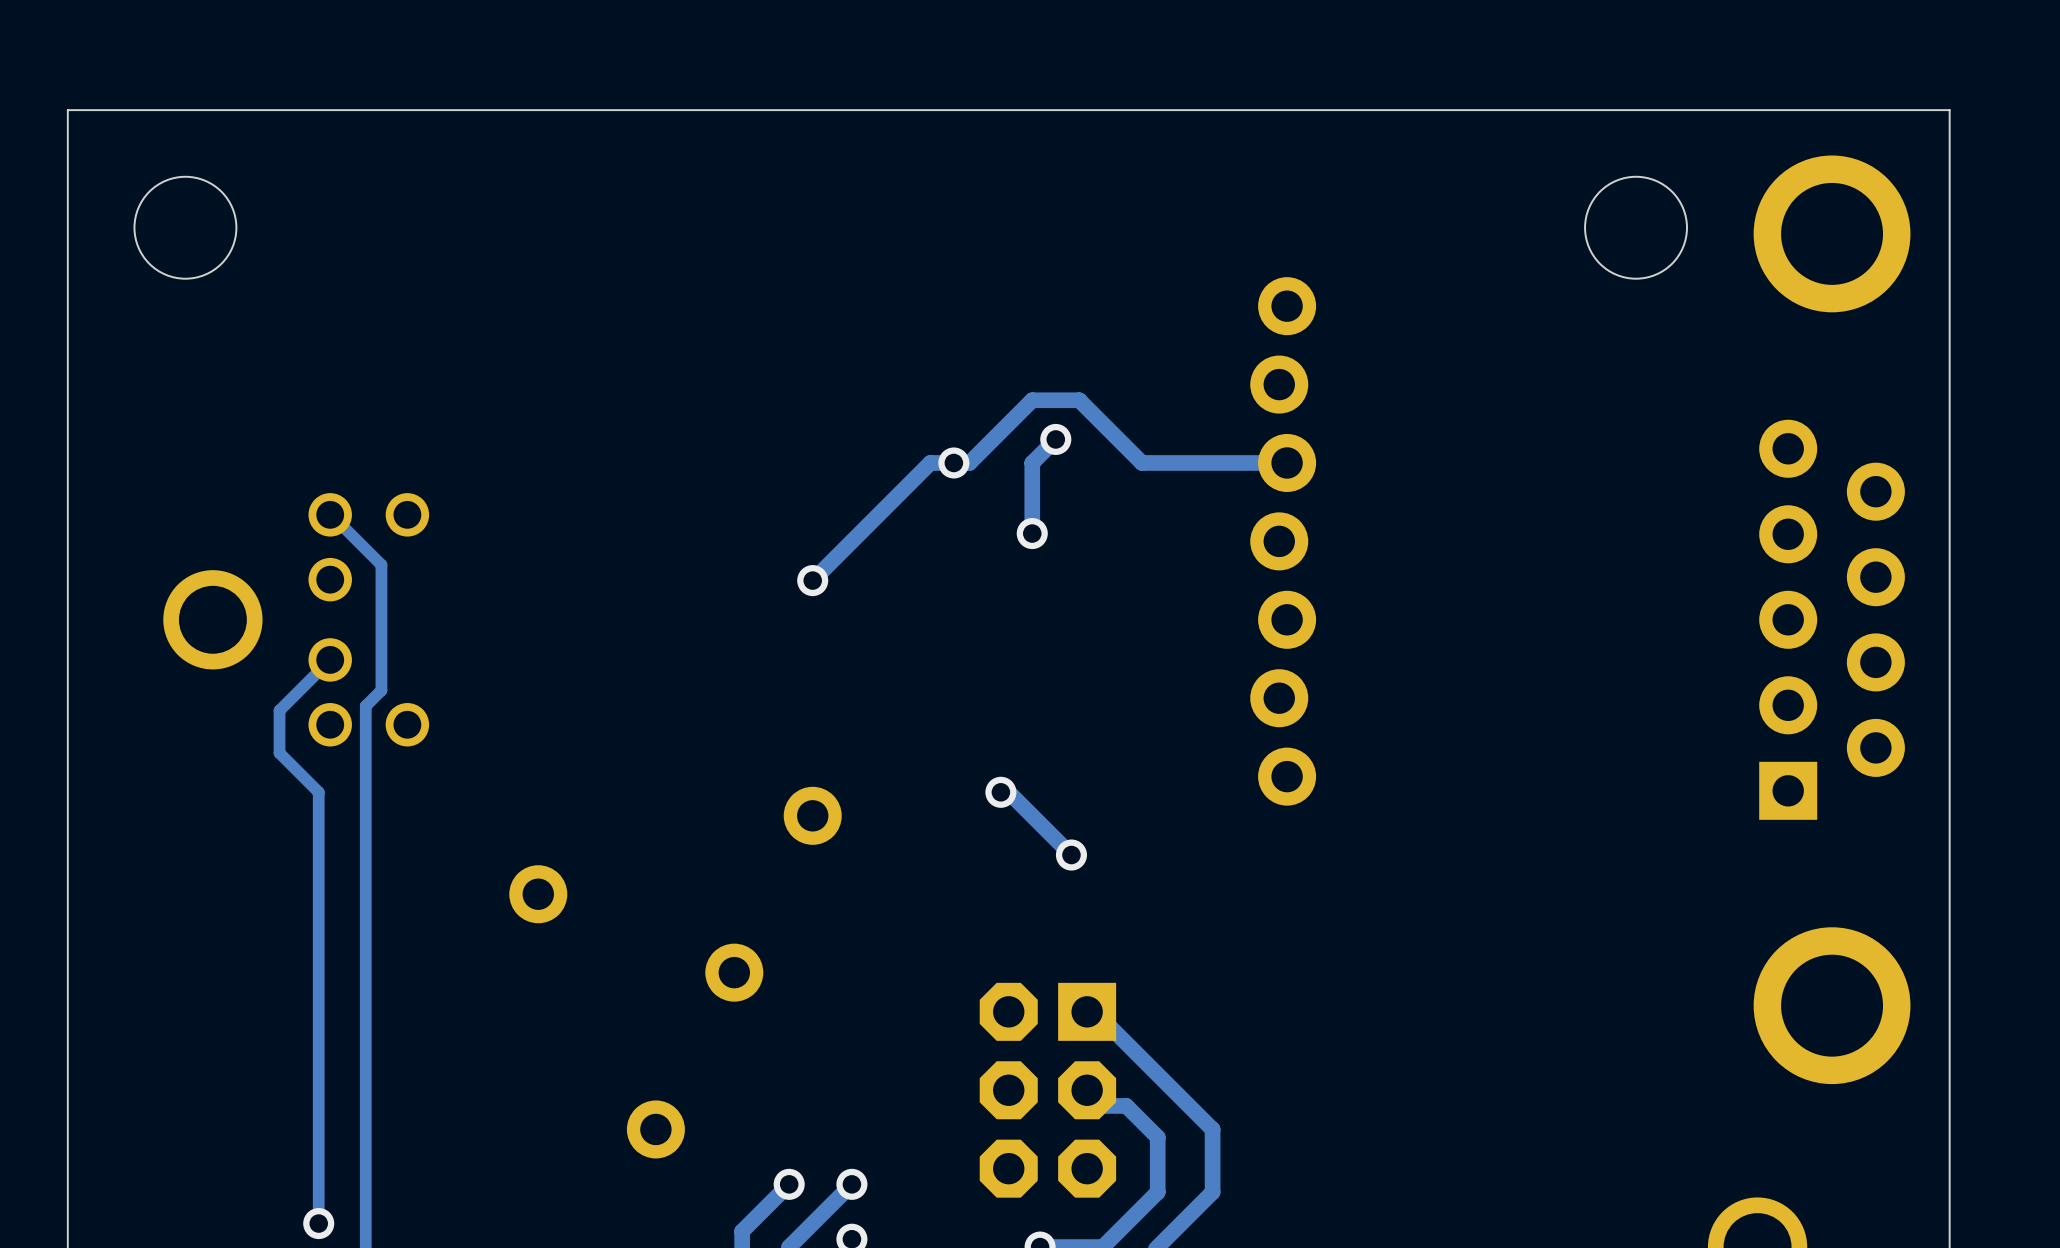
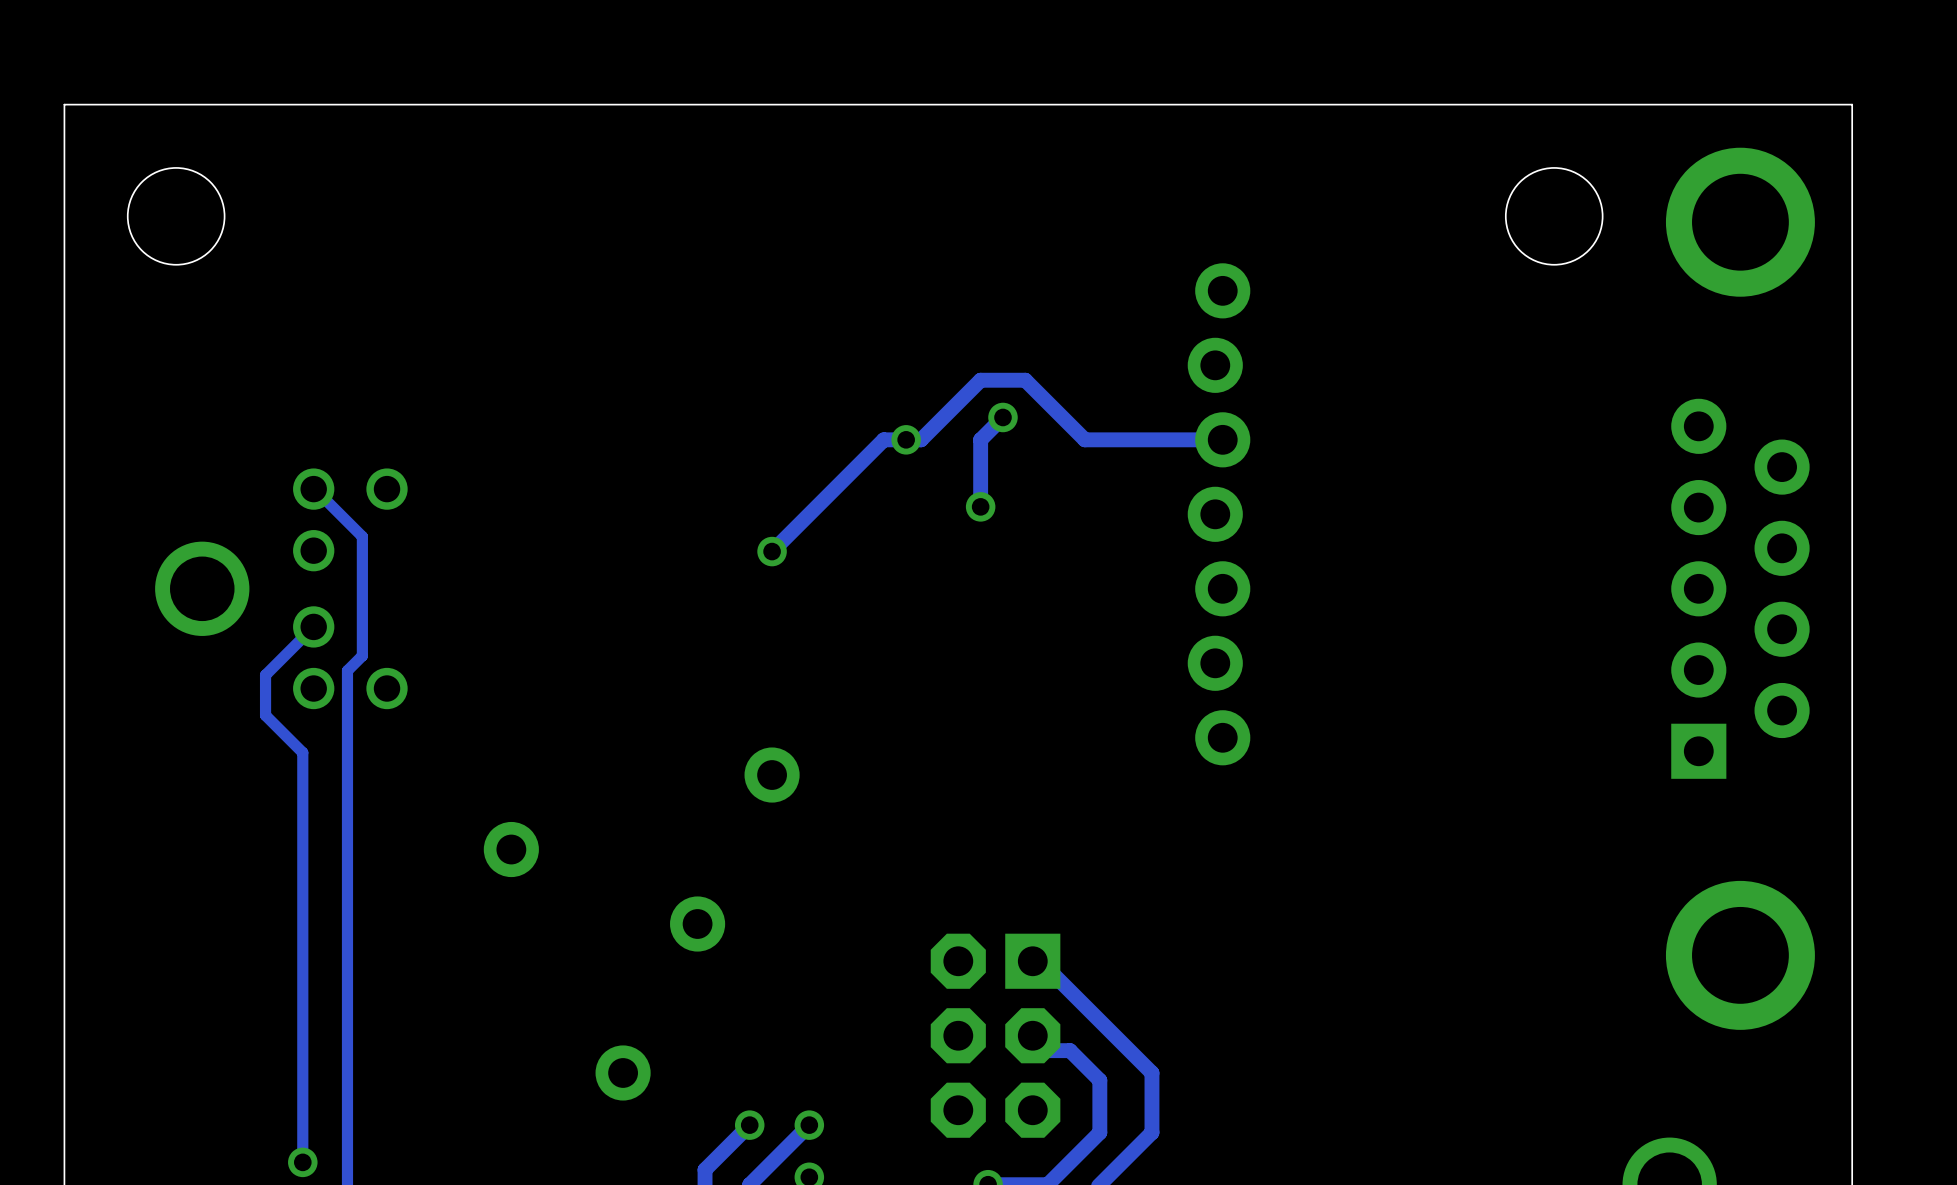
track: (1000, 792) (1008, 792) (1071, 855) -> none
via: (1000, 792) -> none
via: (1071, 855) -> none

